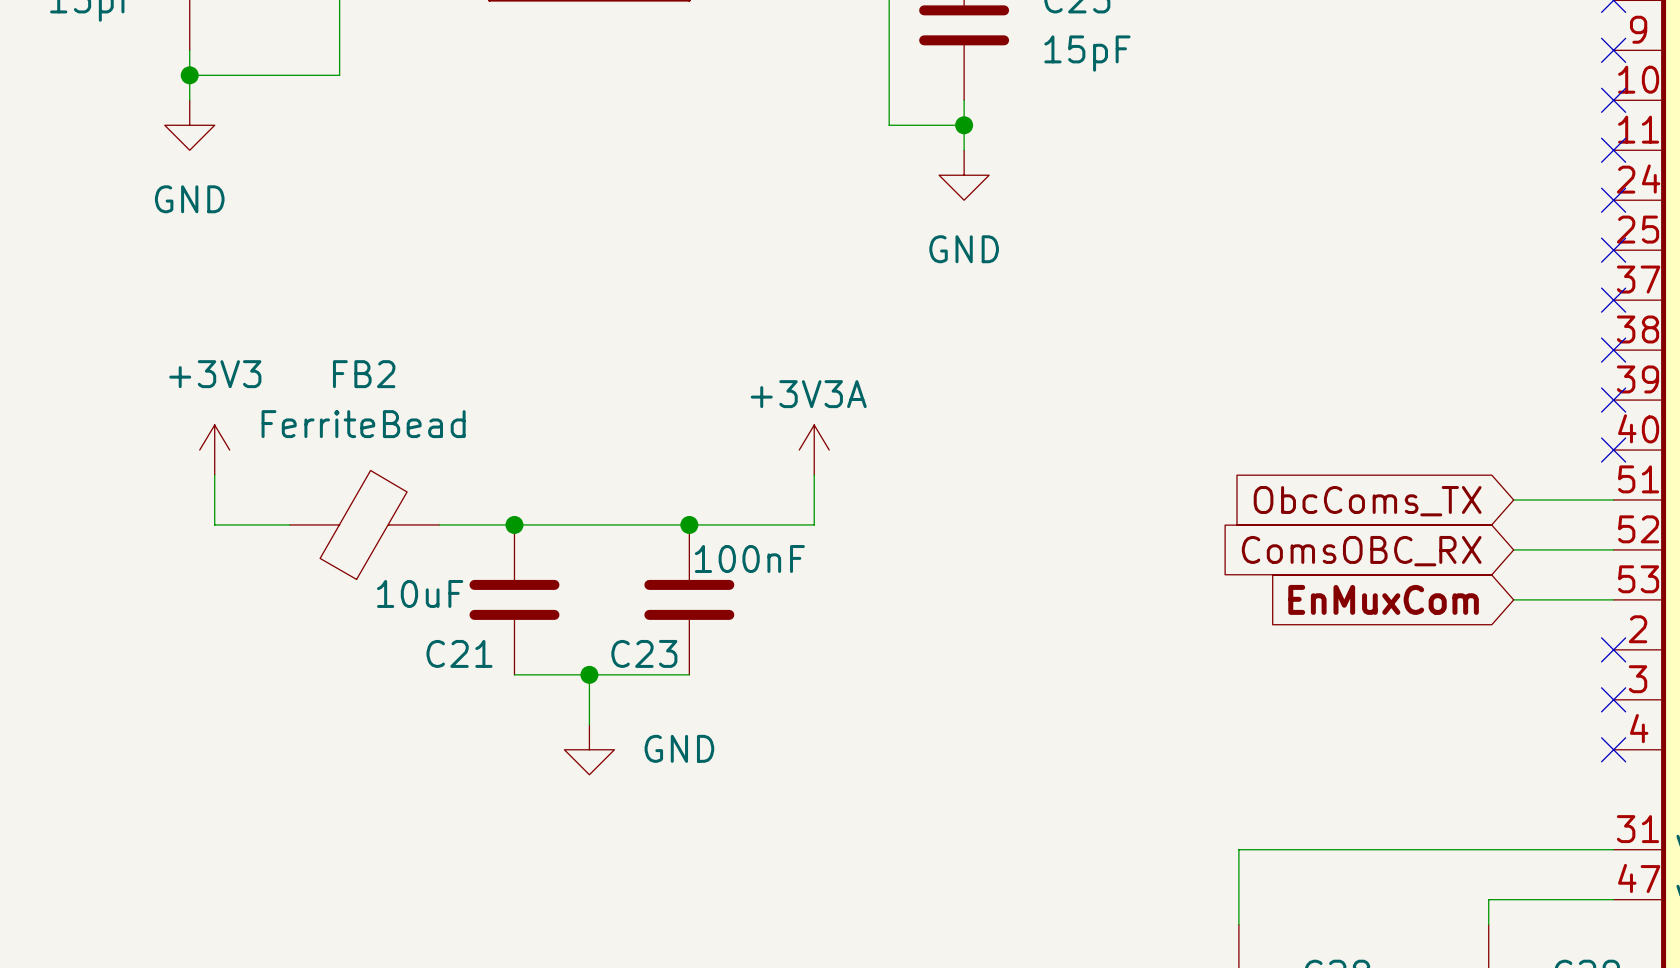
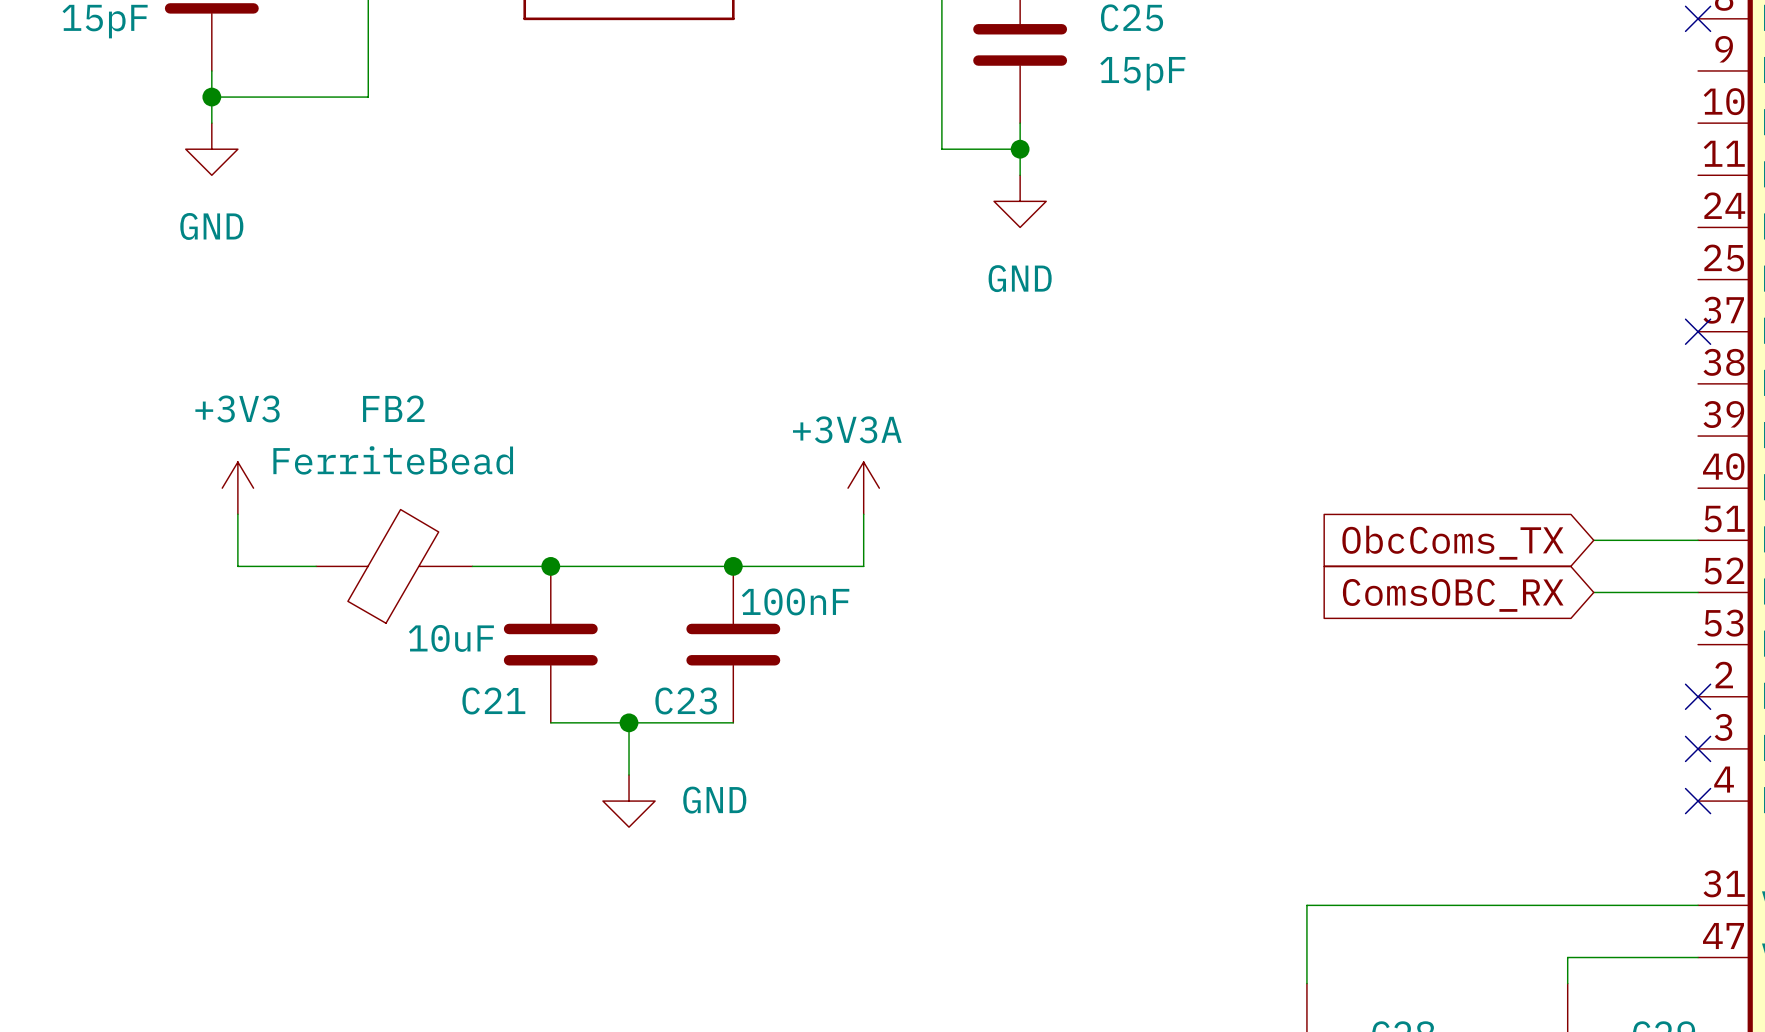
no-connect mark: (1613, 50) -> none
no-connect mark: (1613, 100) -> none
no-connect mark: (1613, 150) -> none
no-connect mark: (1613, 200) -> none
no-connect mark: (1613, 250) -> none
no-connect mark: (1613, 350) -> none
no-connect mark: (1613, 400) -> none
no-connect mark: (1613, 450) -> none
global label: EnMuxCom (1383, 599) -> none
wire: (1513, 599) (1613, 599) -> none

